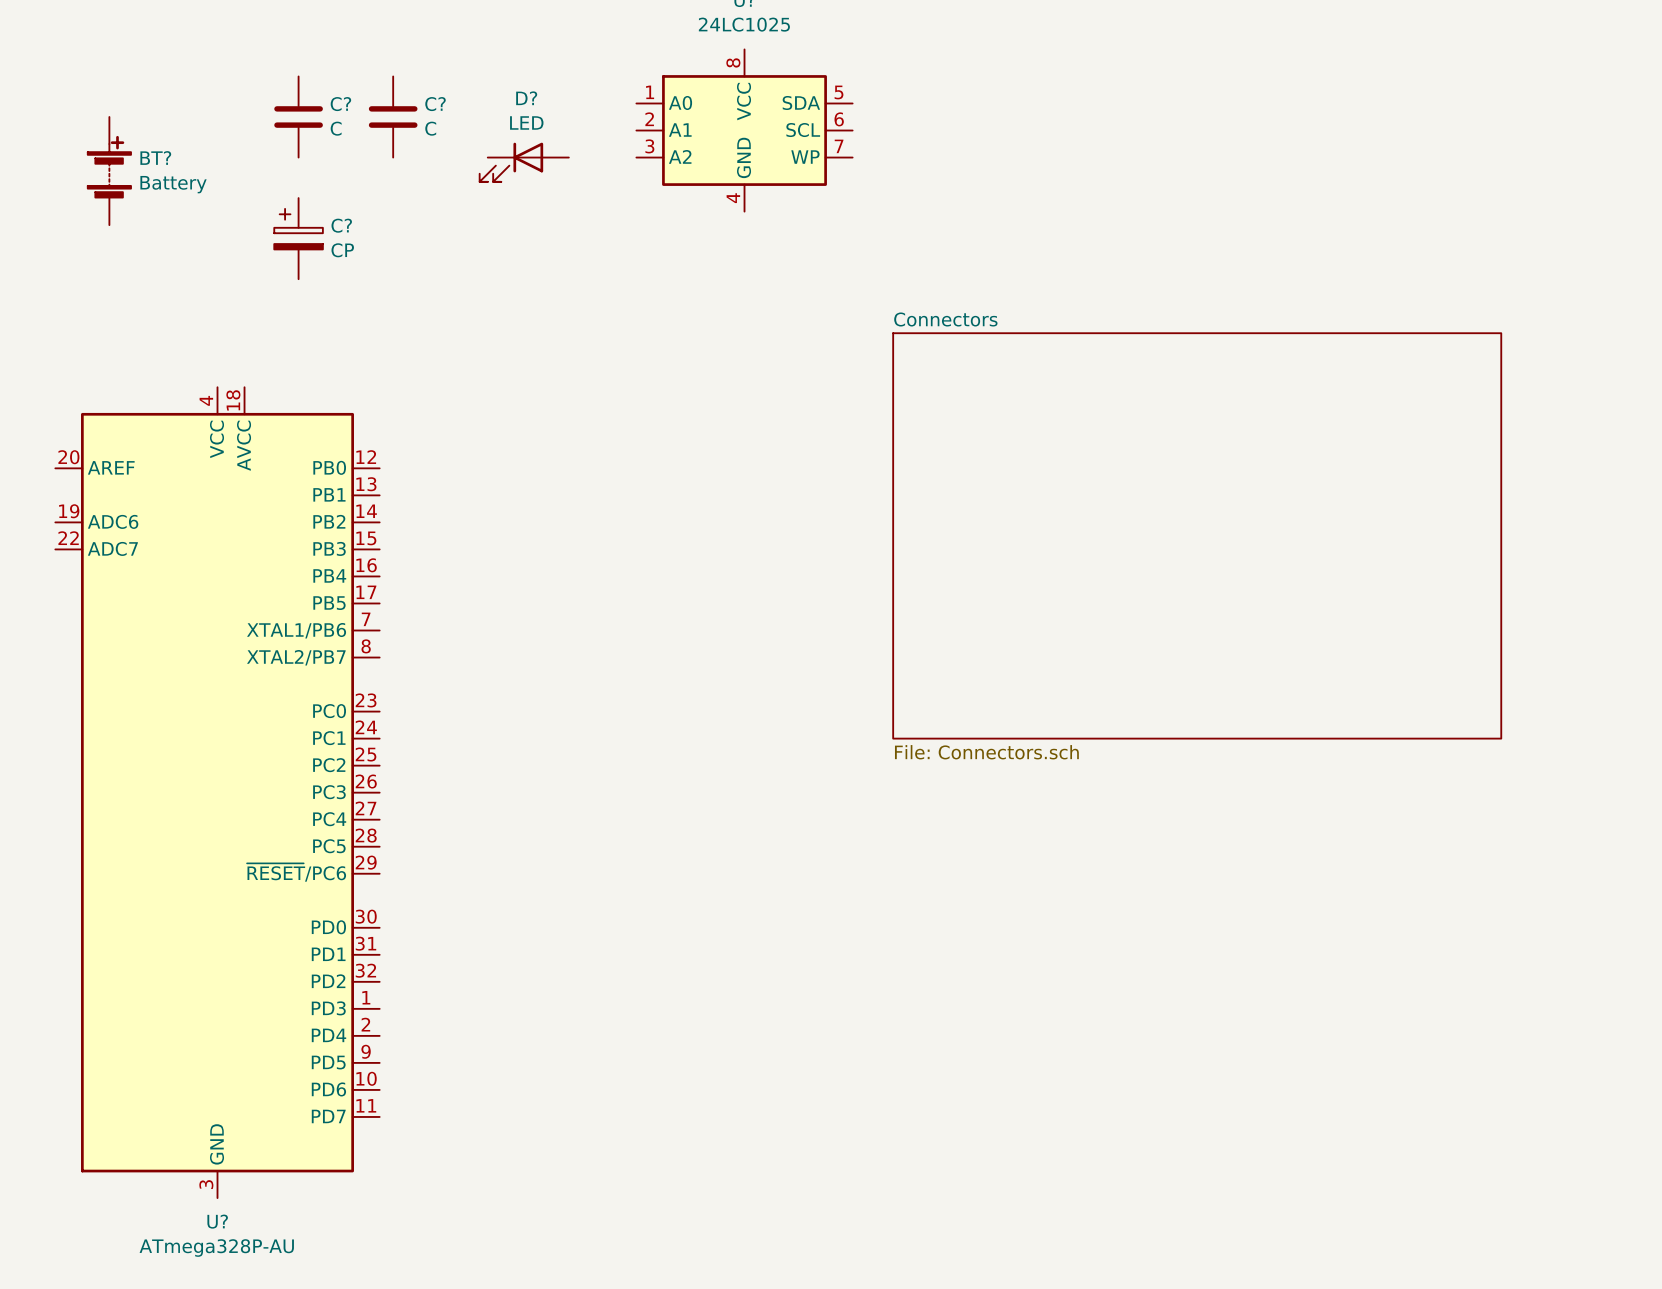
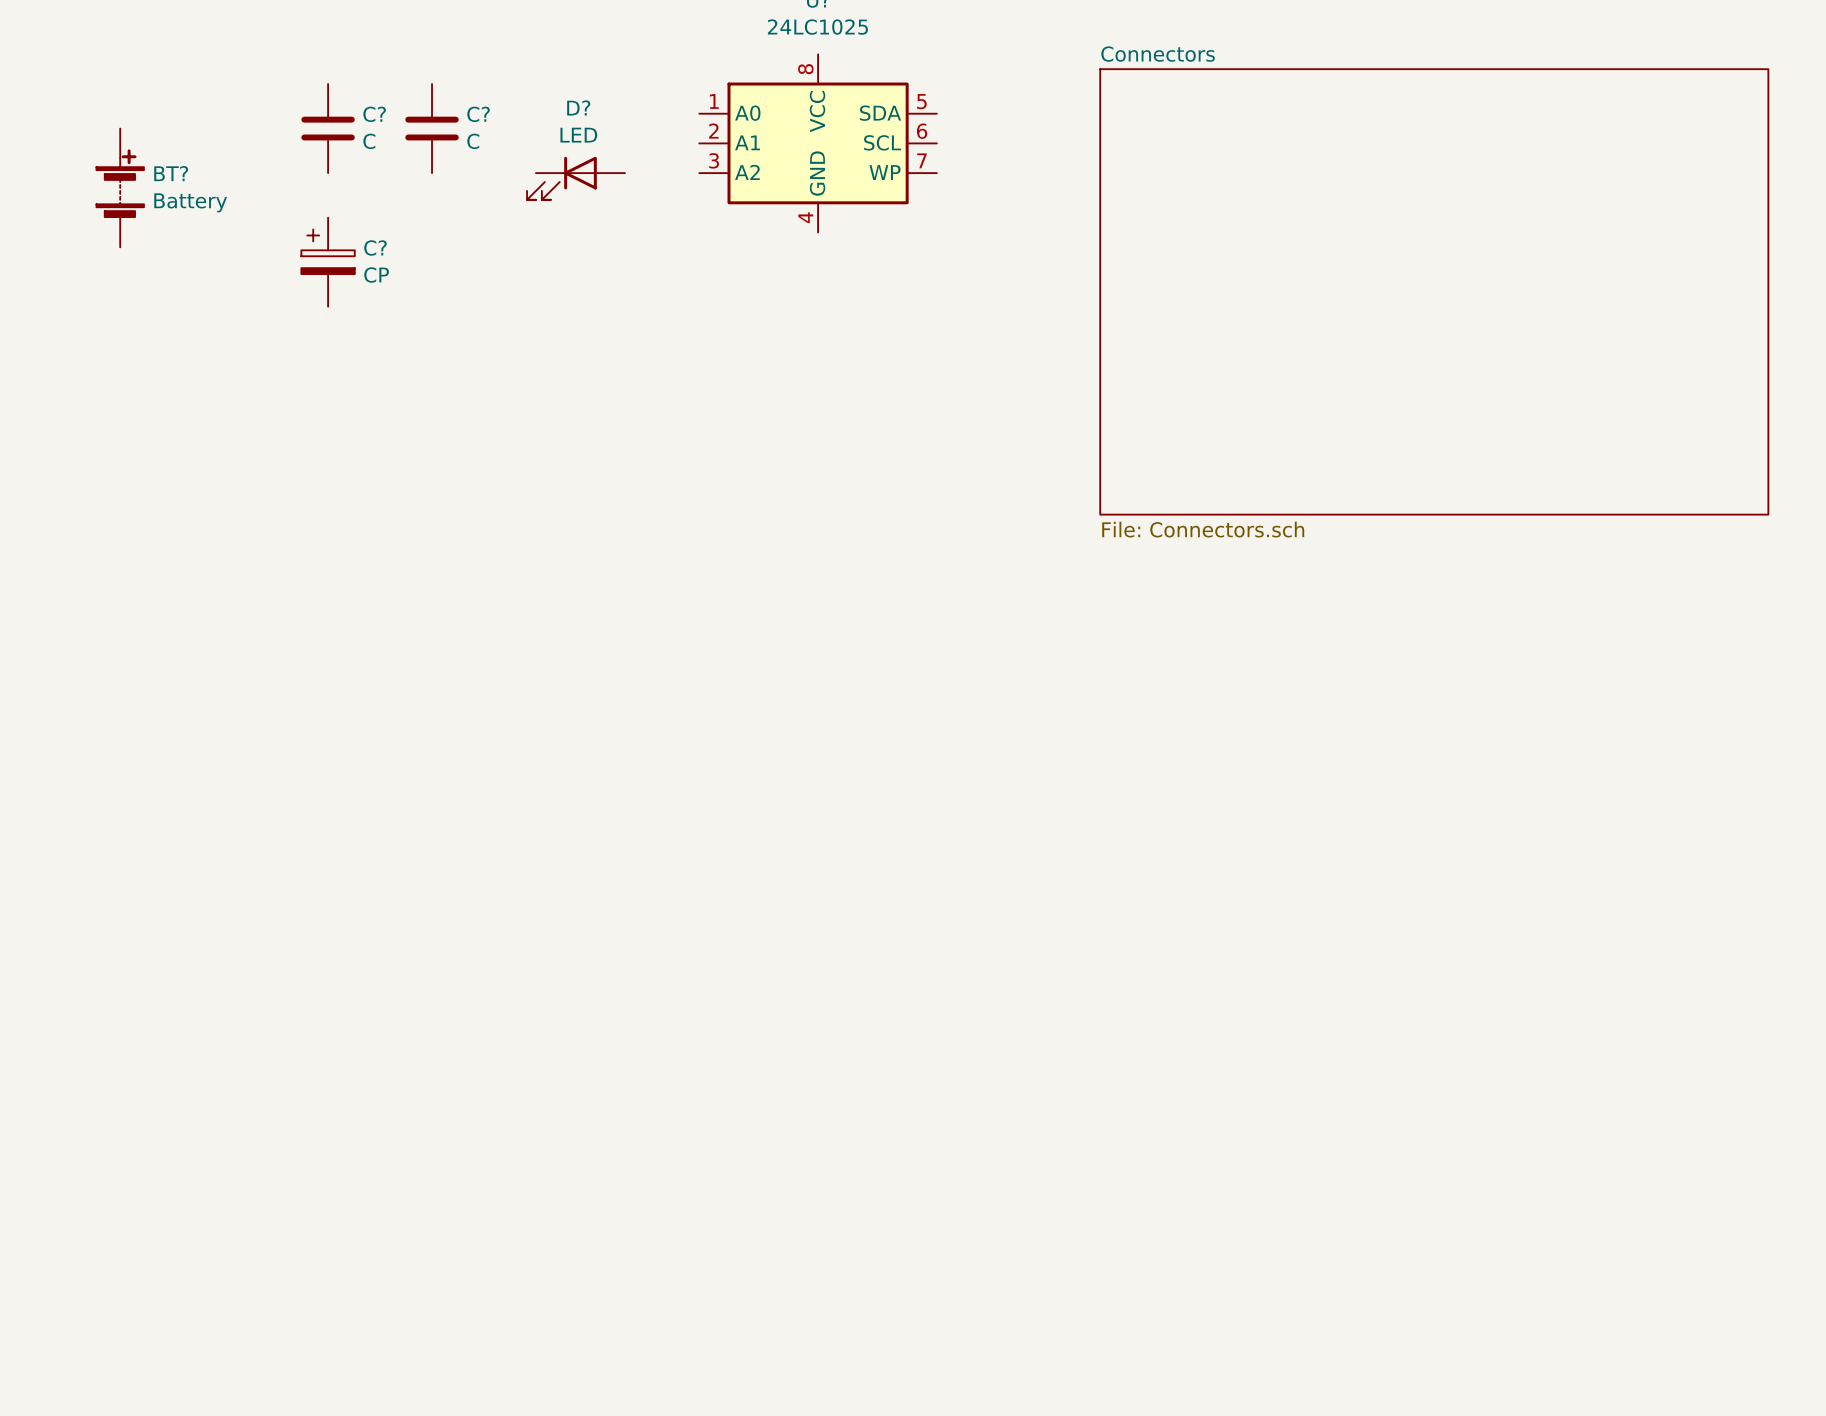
sheet Connectors: none -> File: Connectors.sch (1434, 291)
sheet Connectors: File: Connectors.sch (1197, 535) -> none
U?: ATmega328P-AU (217, 792) -> none

